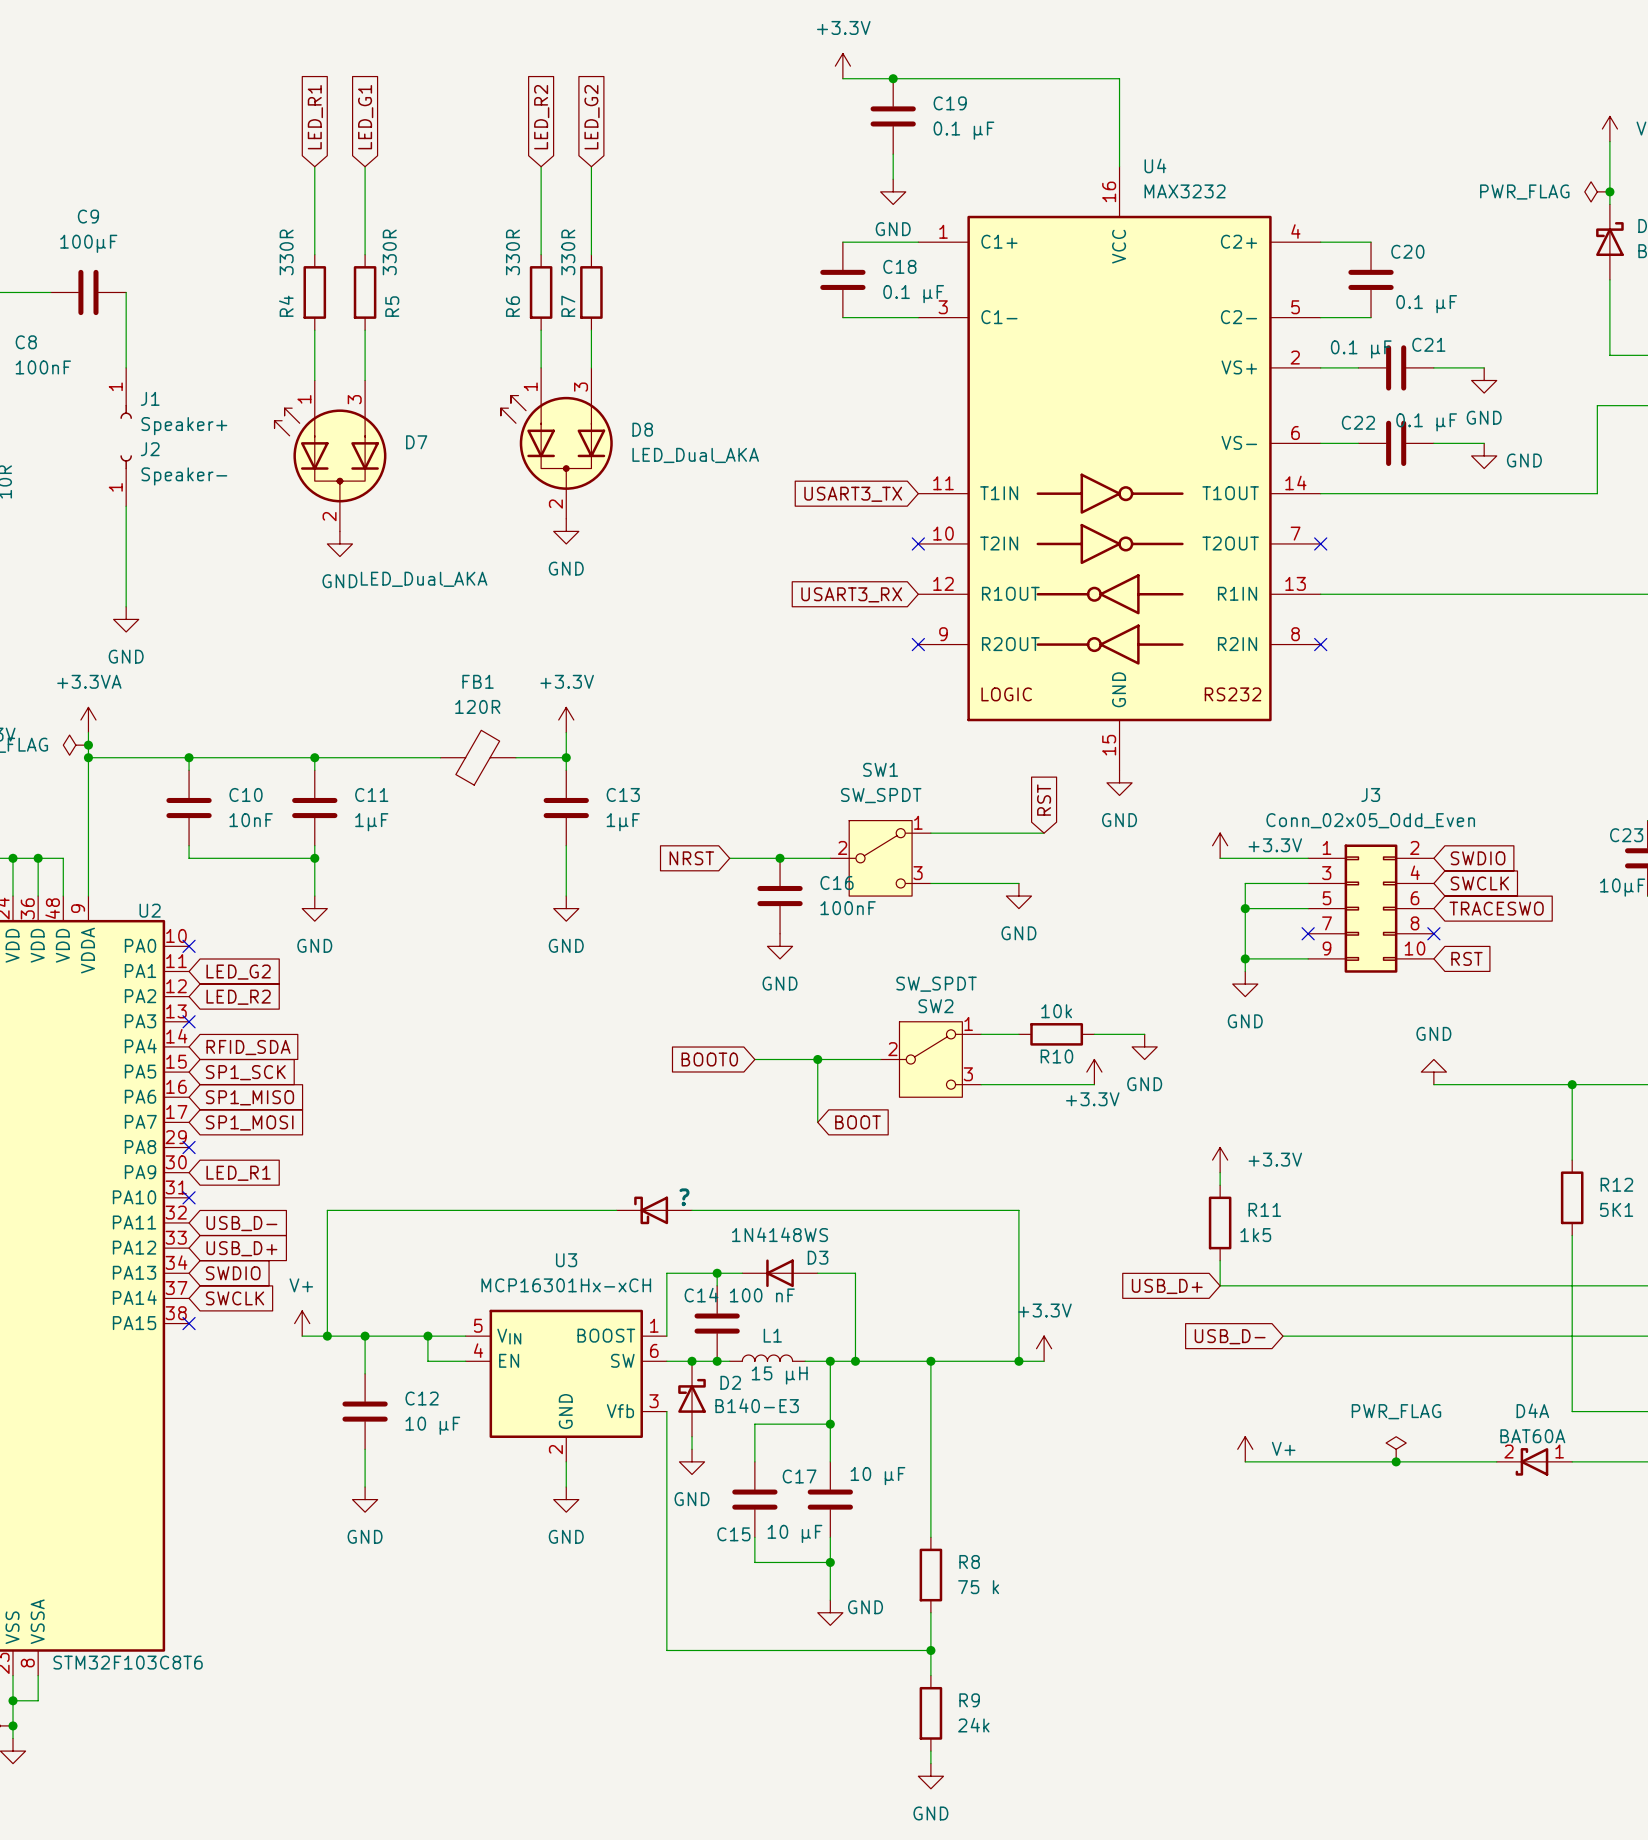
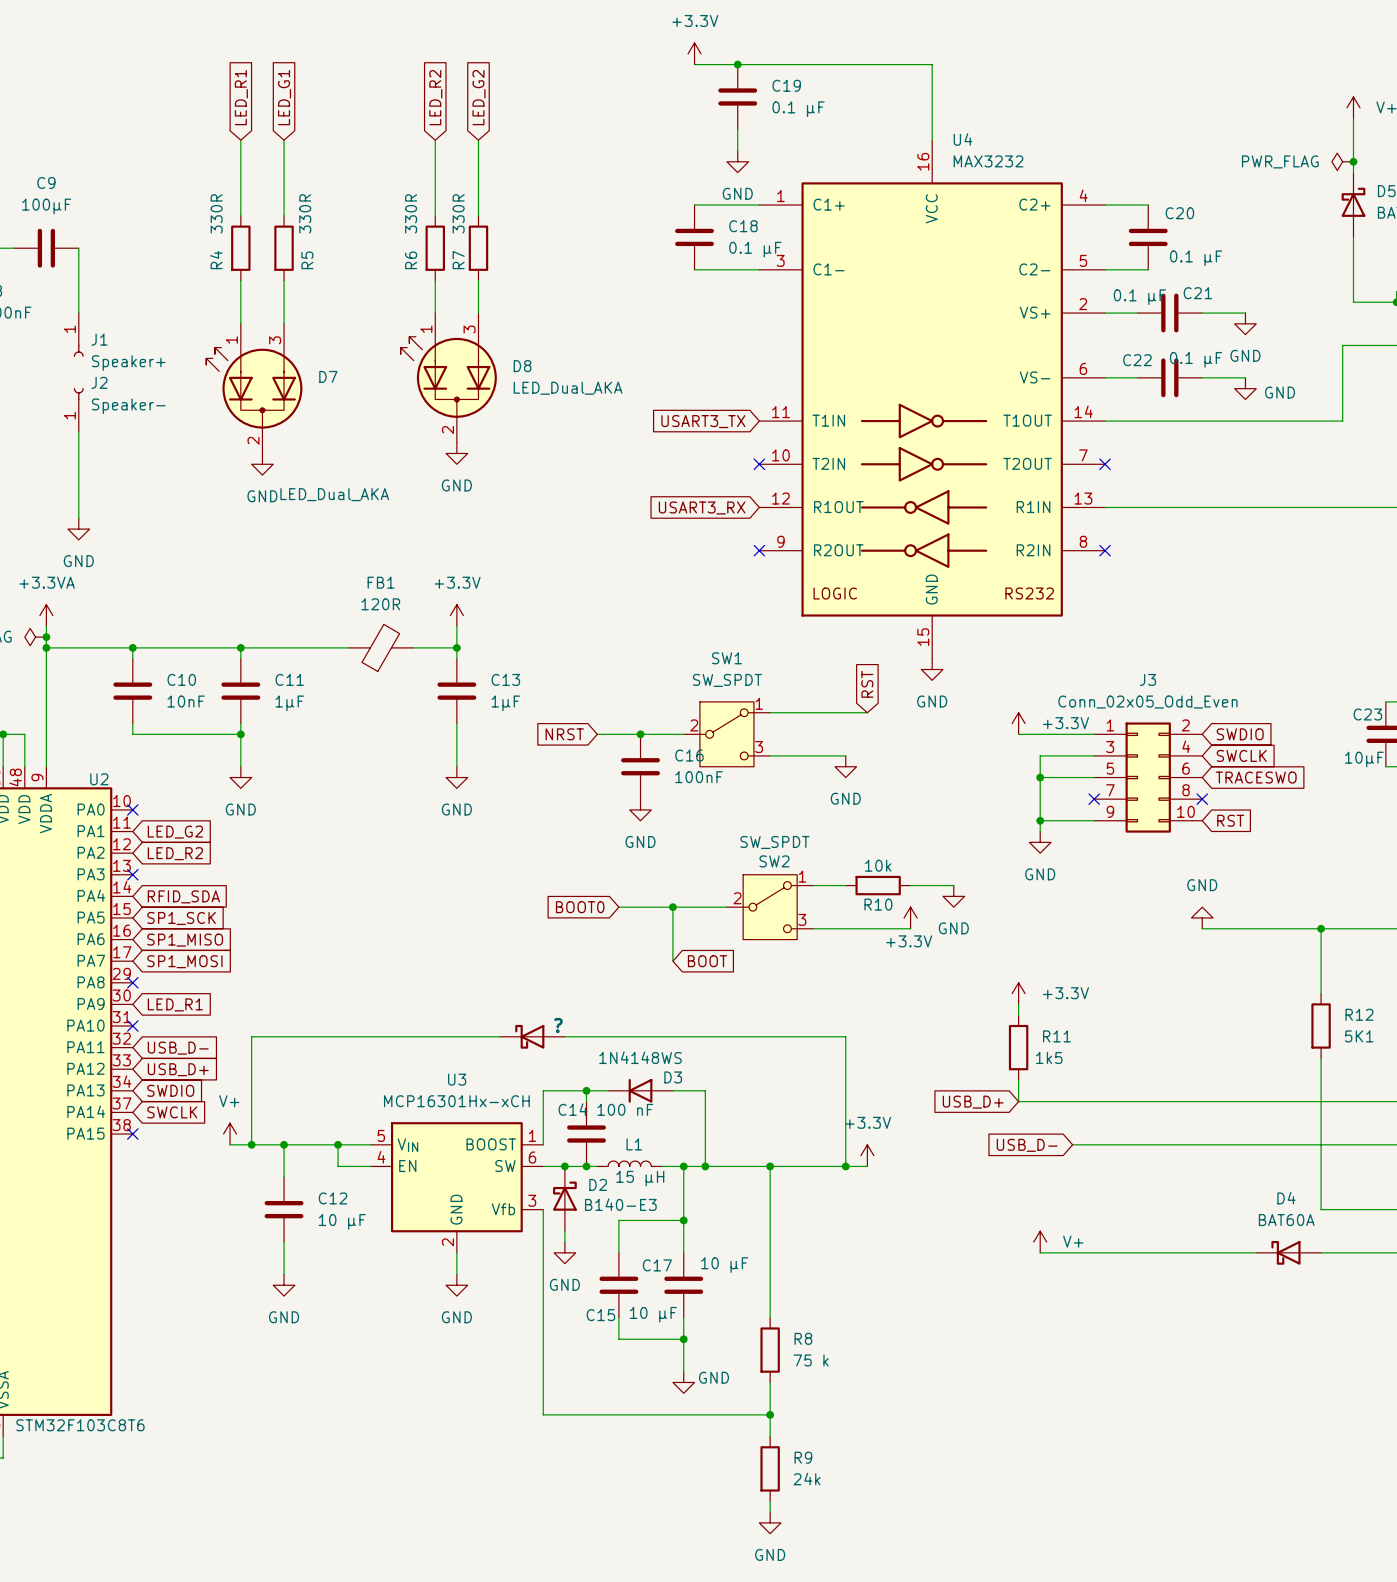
power symbol: PWR_FLAG (1396, 1449) -> none
junction: (1396, 1461) -> none
D4A: BAT60A (1534, 1461) -> none
D4: none -> BAT60A (1288, 1252)

